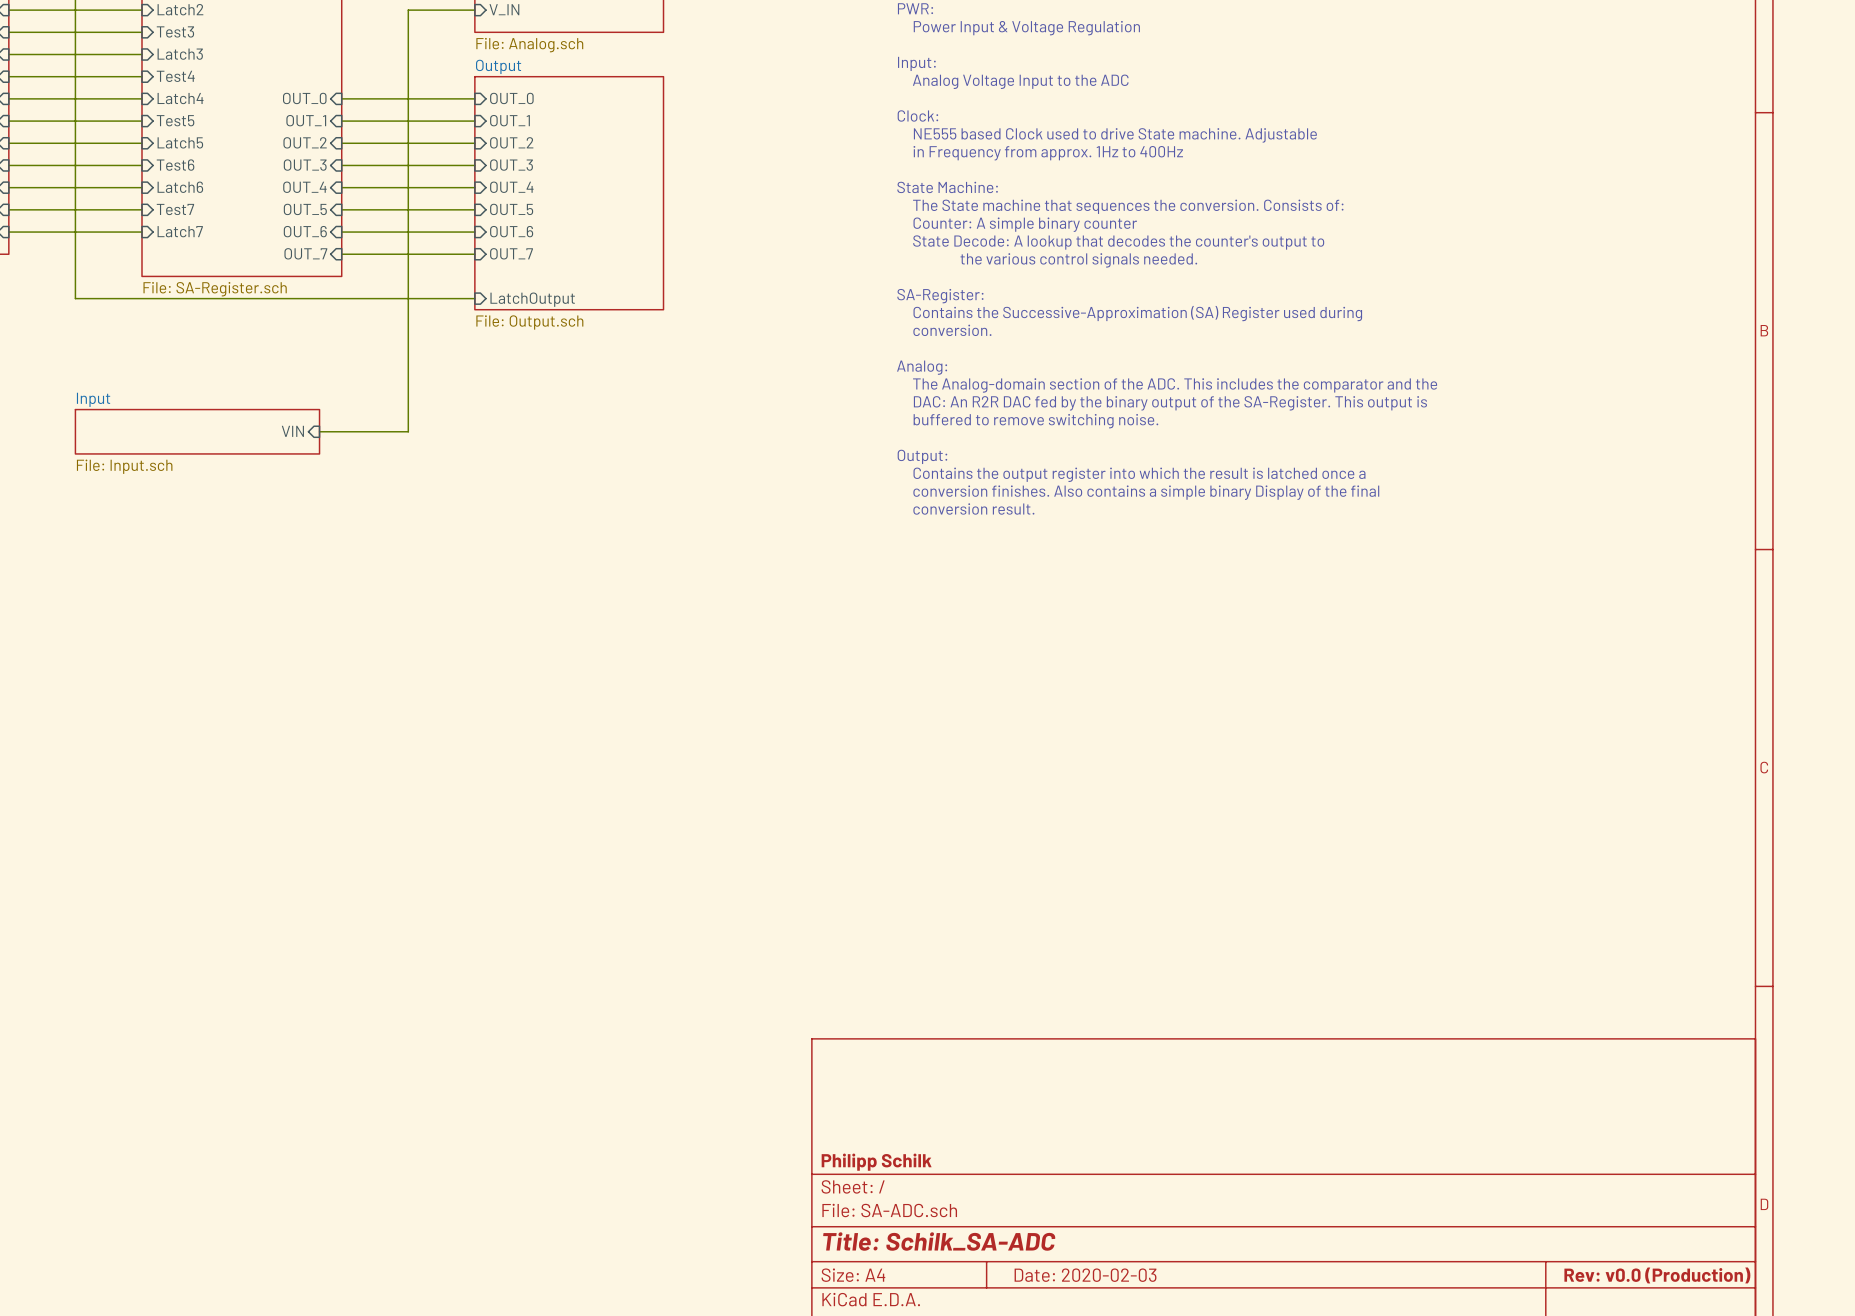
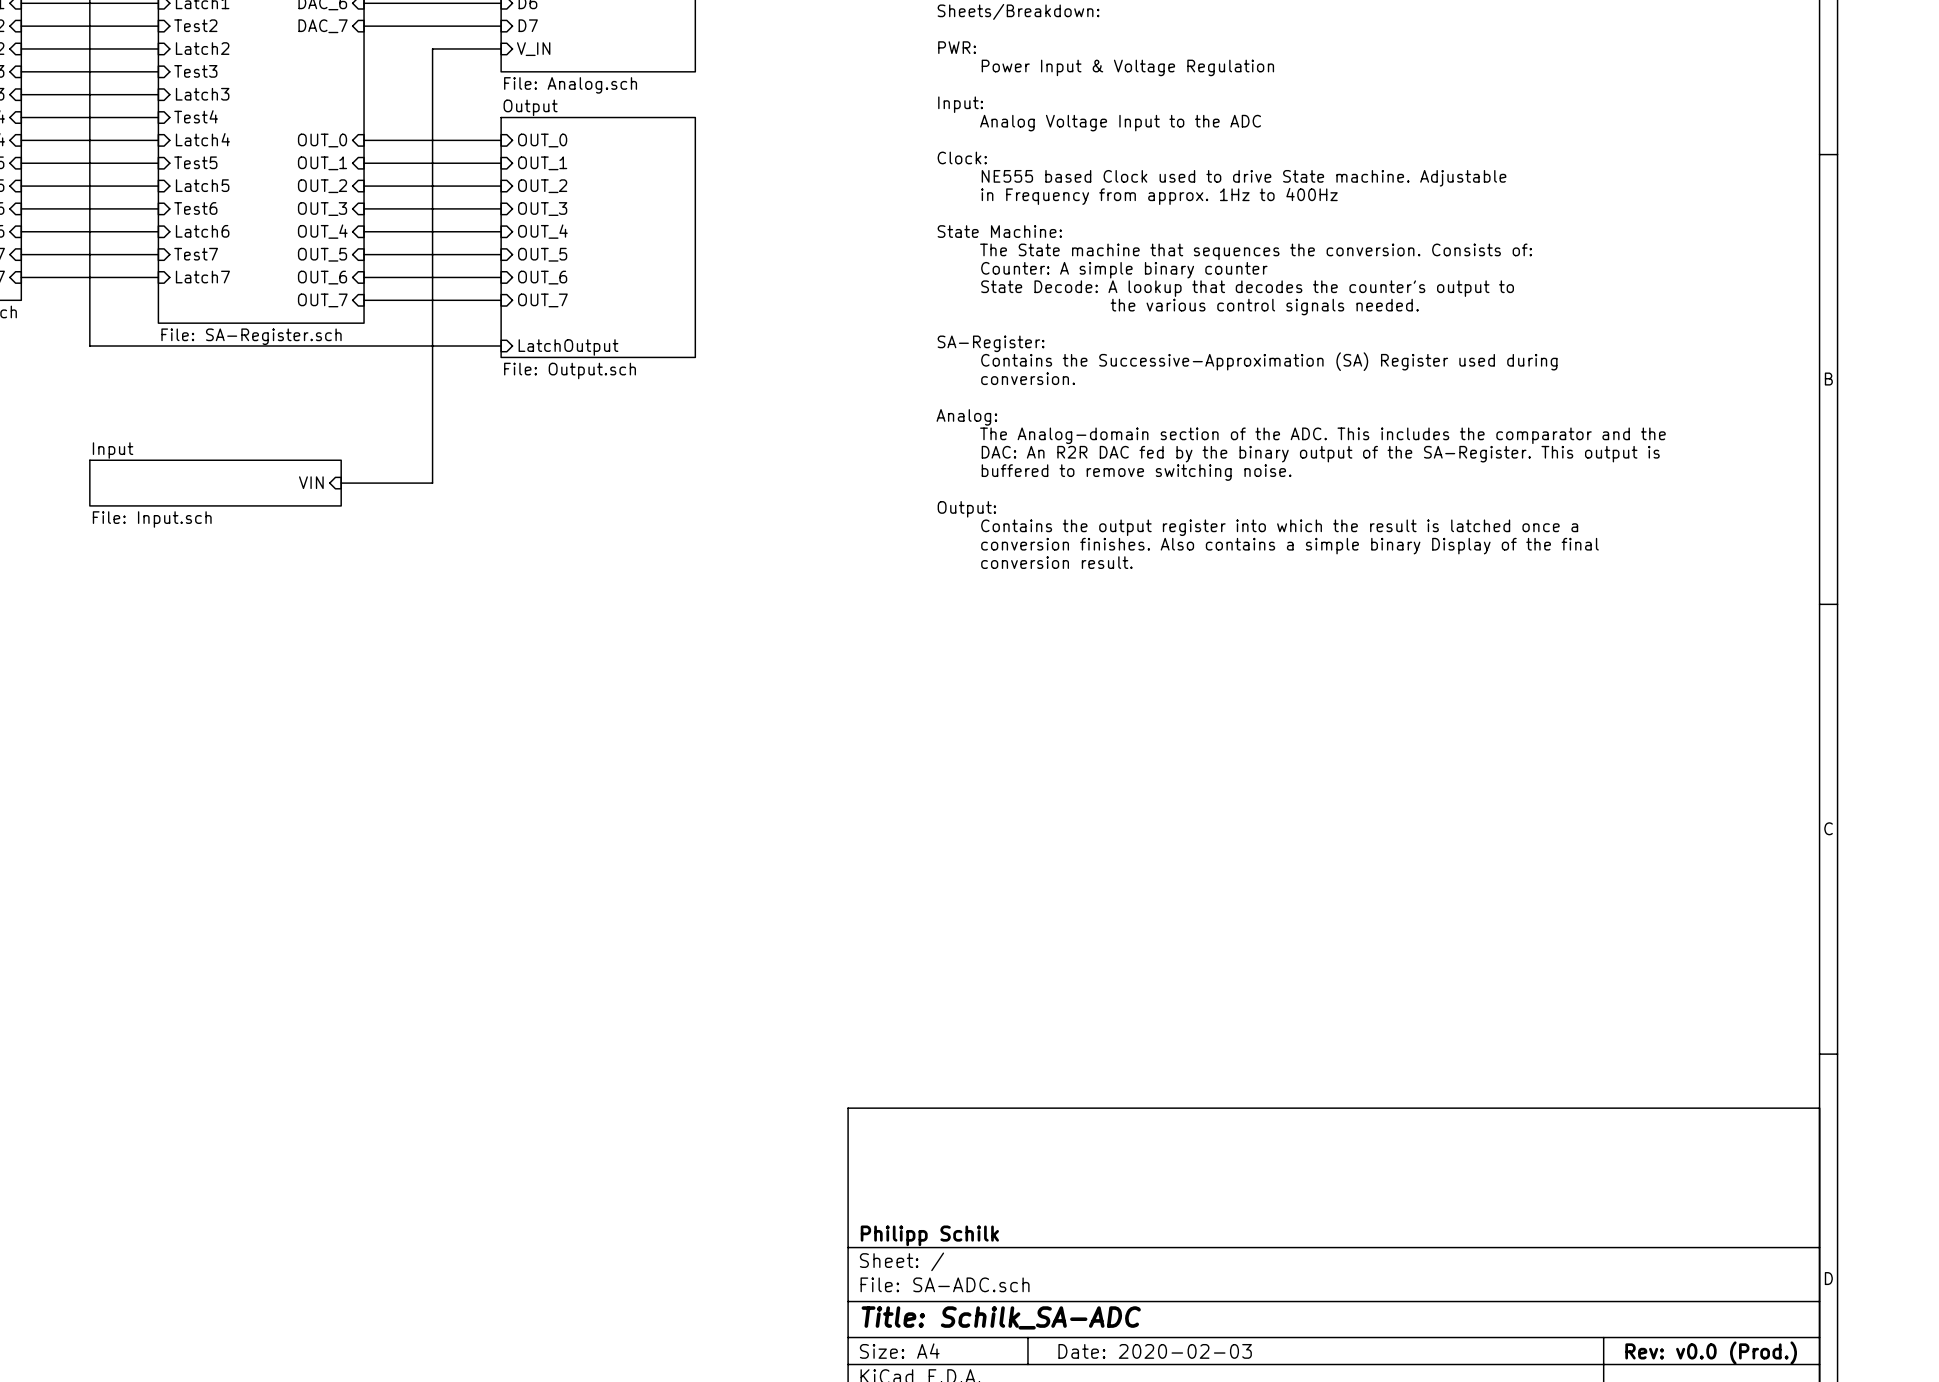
title block: Rev: v0.0 (Production) (1657, 1275) -> Rev: v0.0 (Prod.) (1711, 1353)

